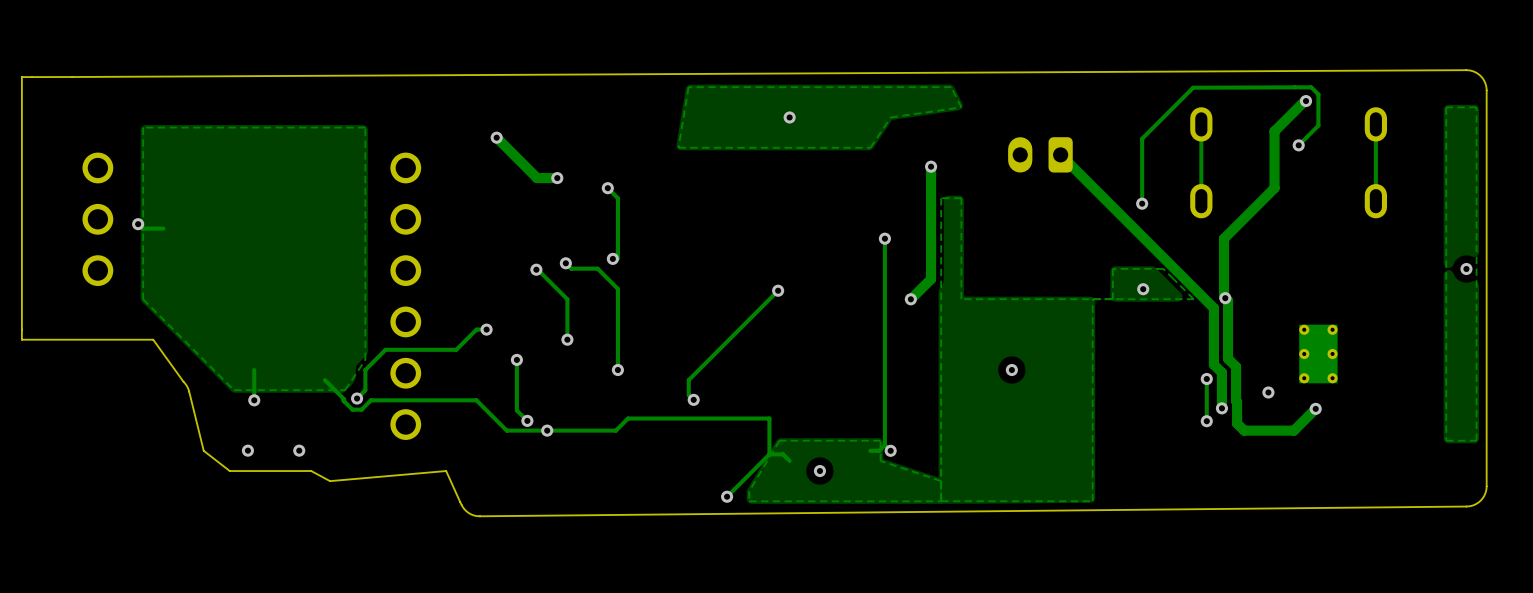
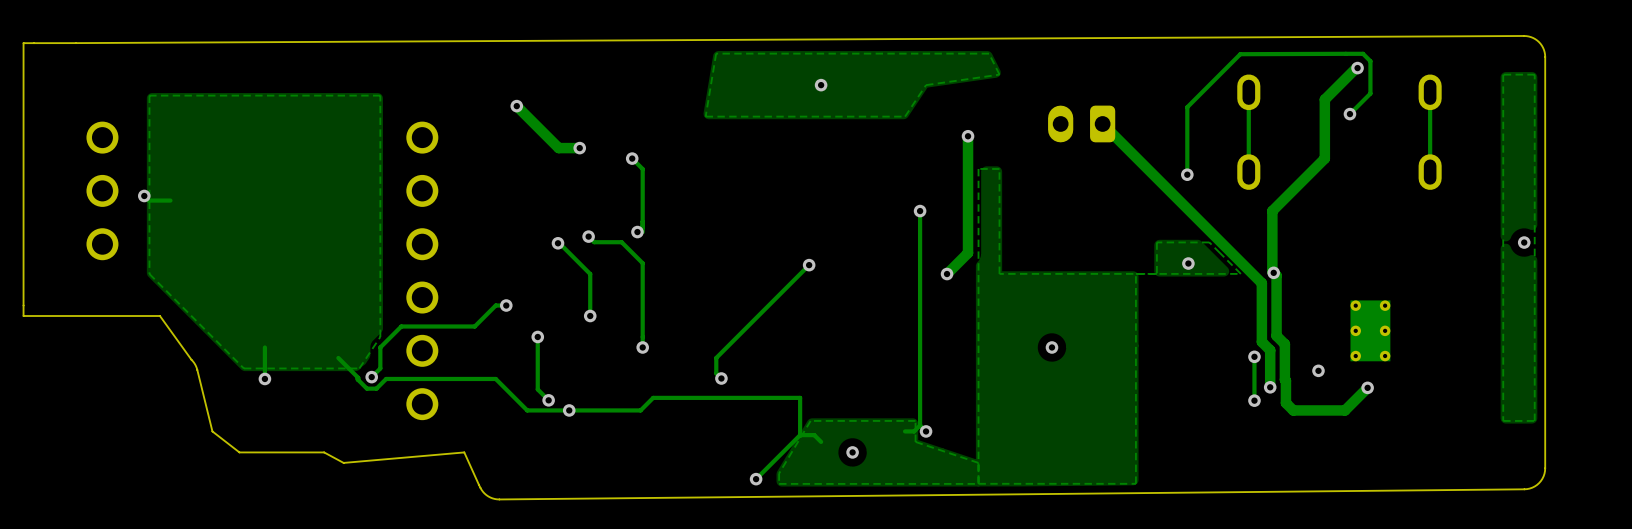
via: (247, 450) -> none
via: (299, 450) -> none

